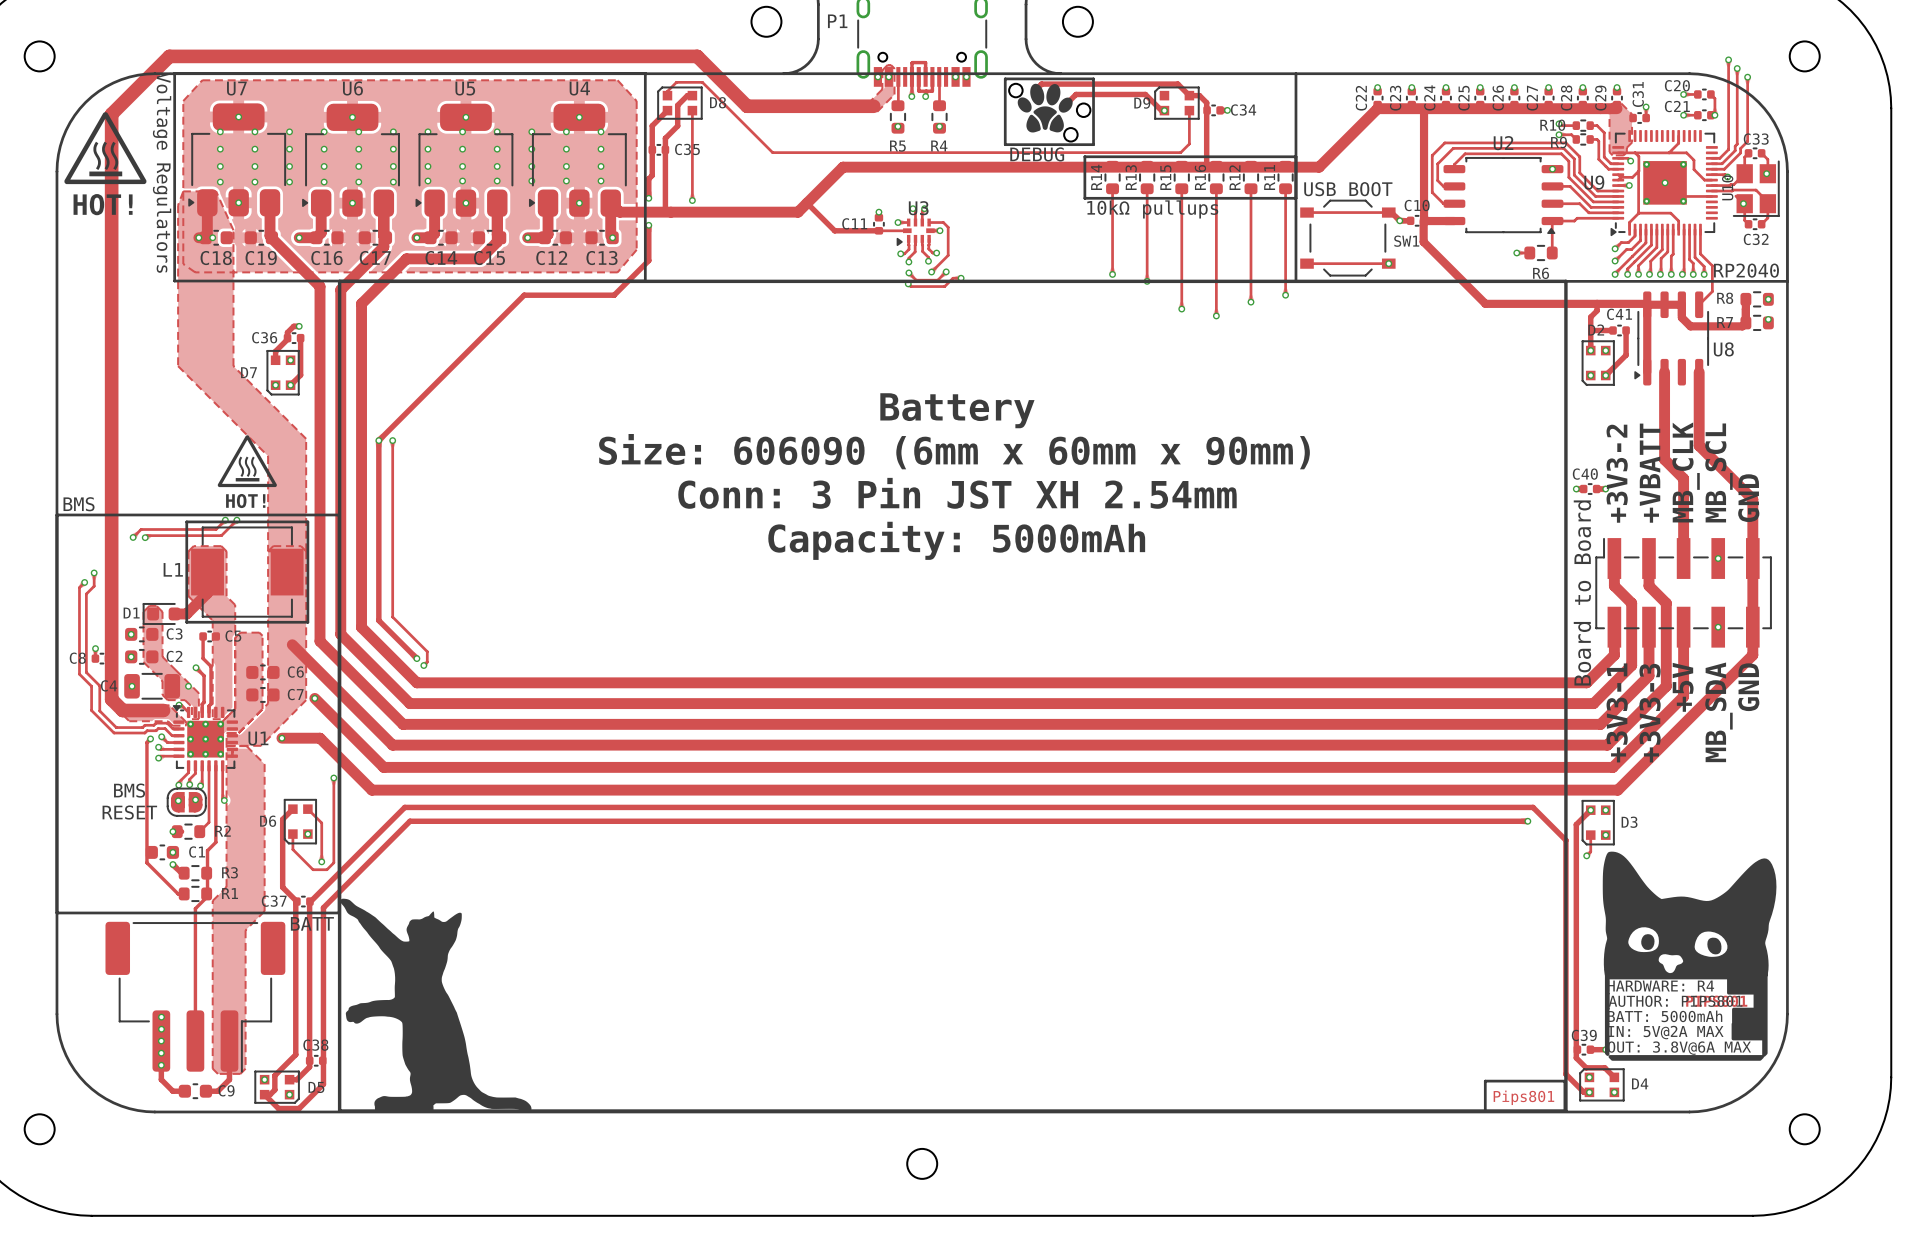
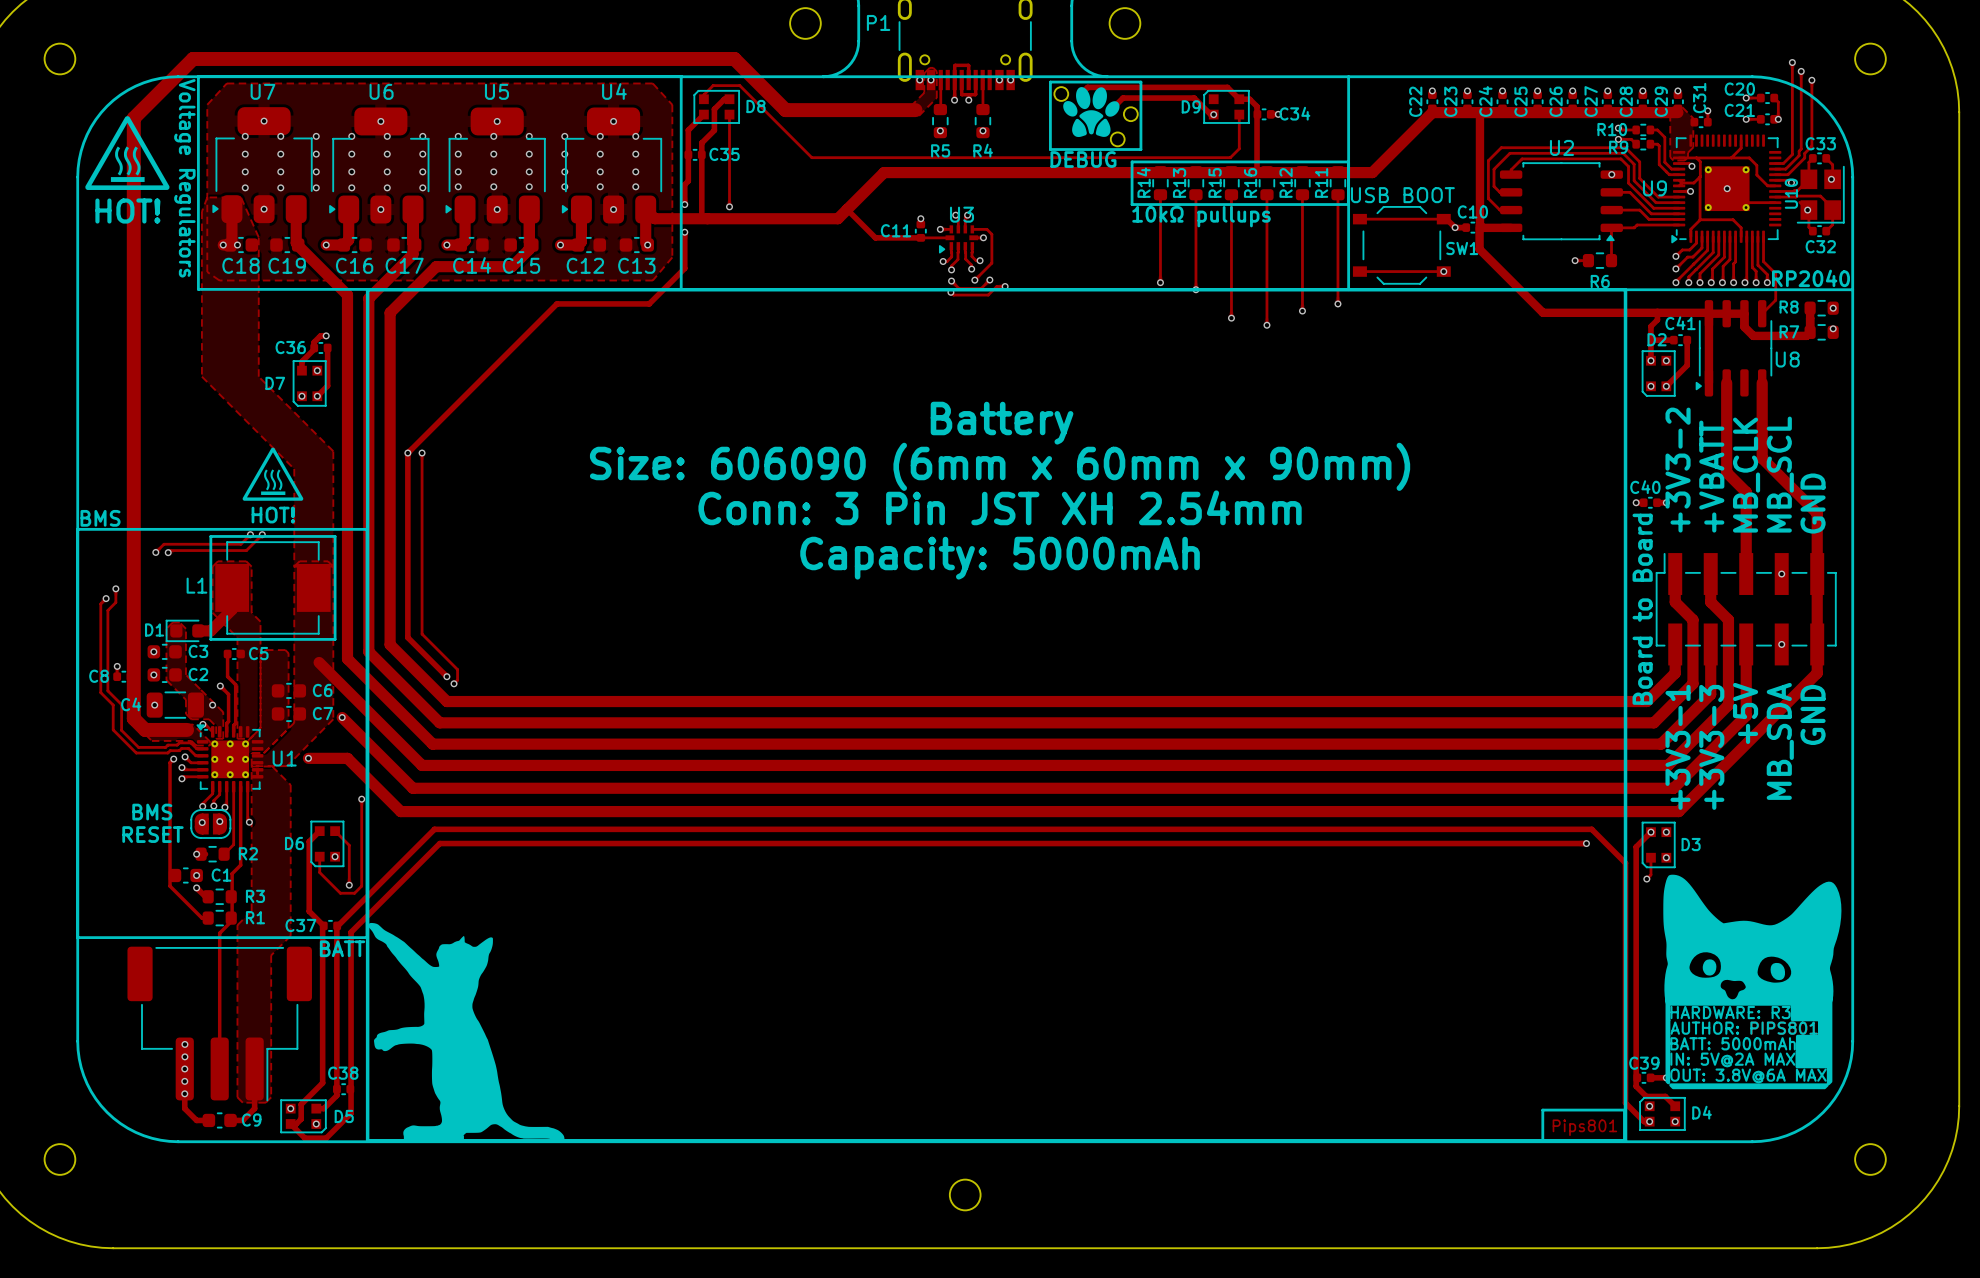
text: HARDWARE: R4 (1660, 986) -> HARDWARE: R3 (1730, 1012)

